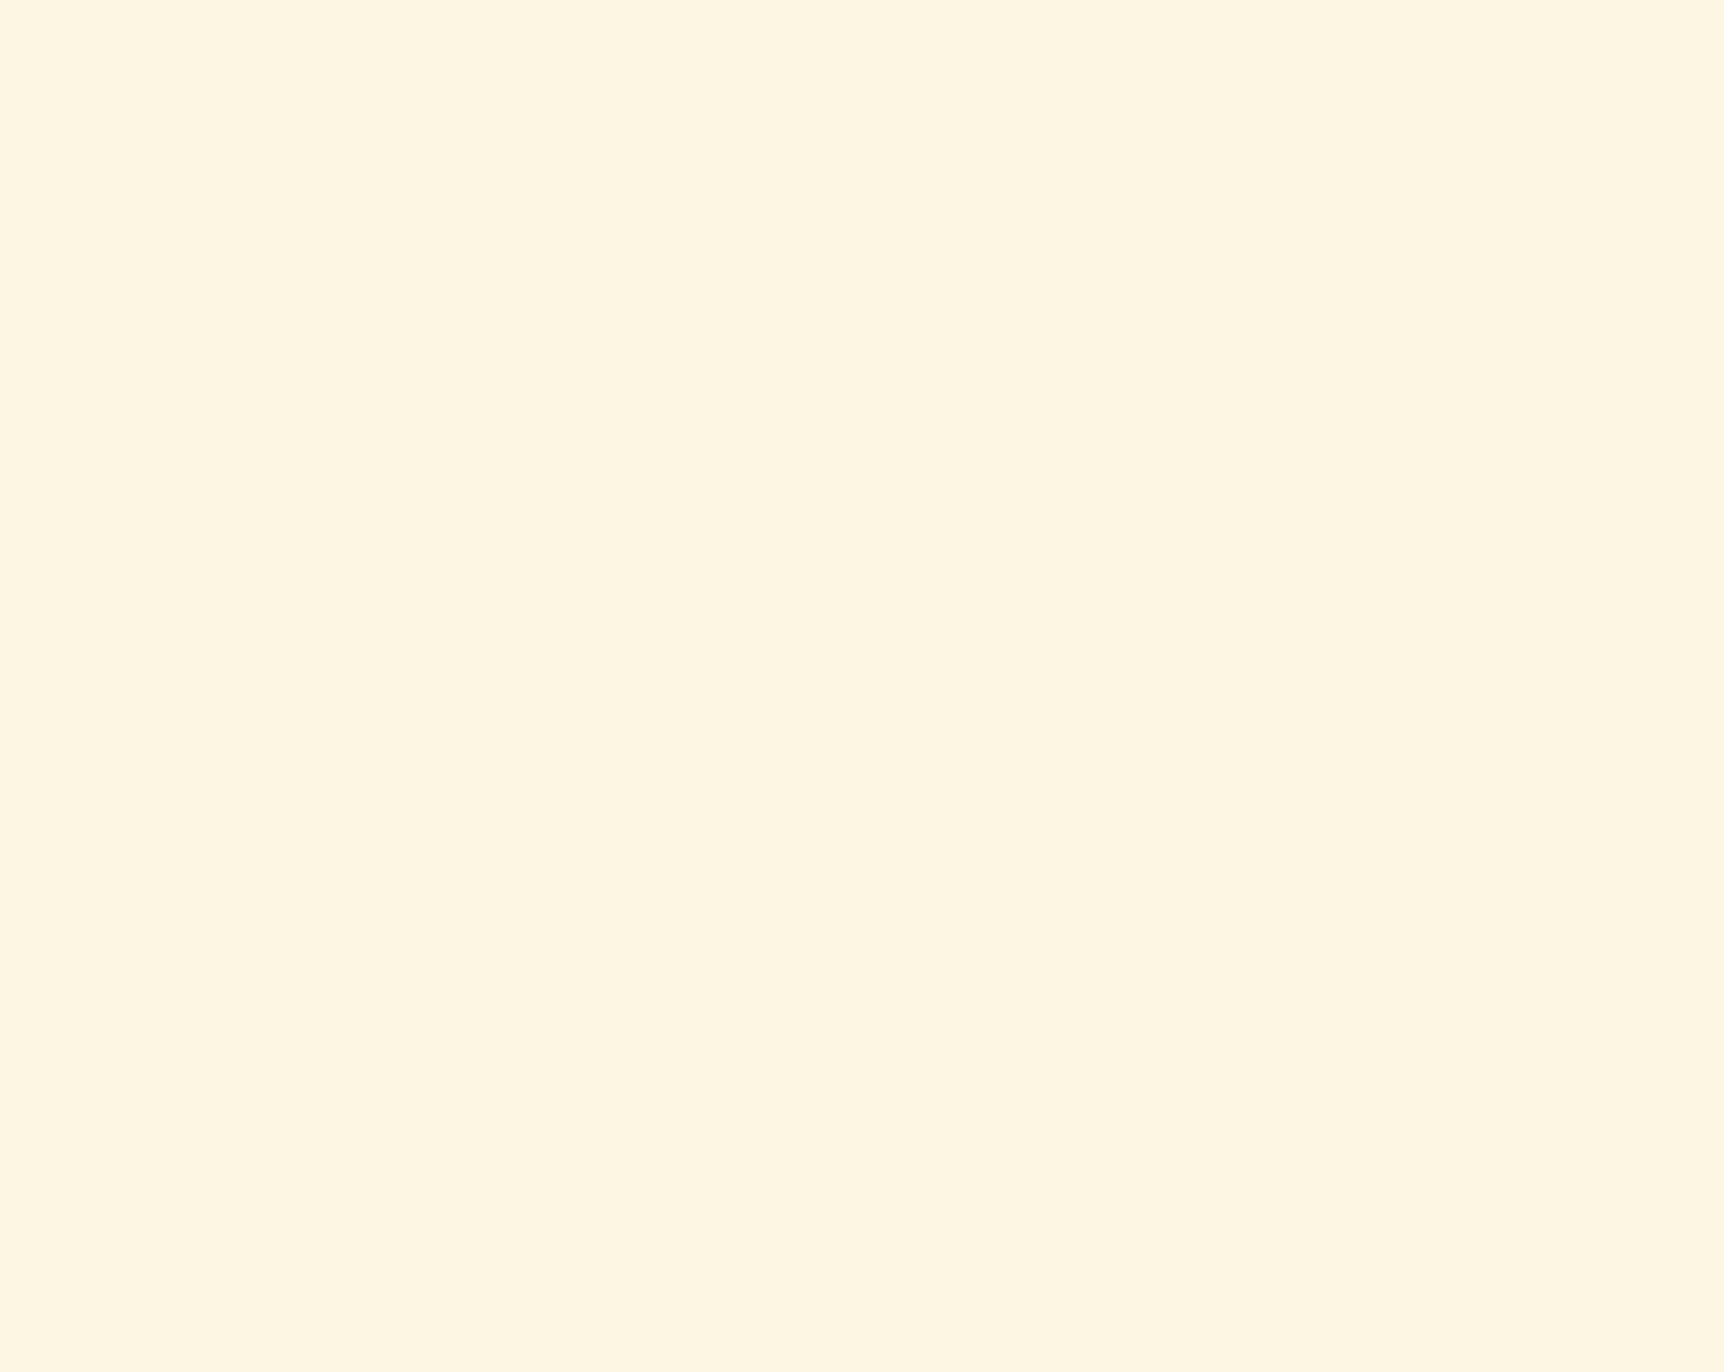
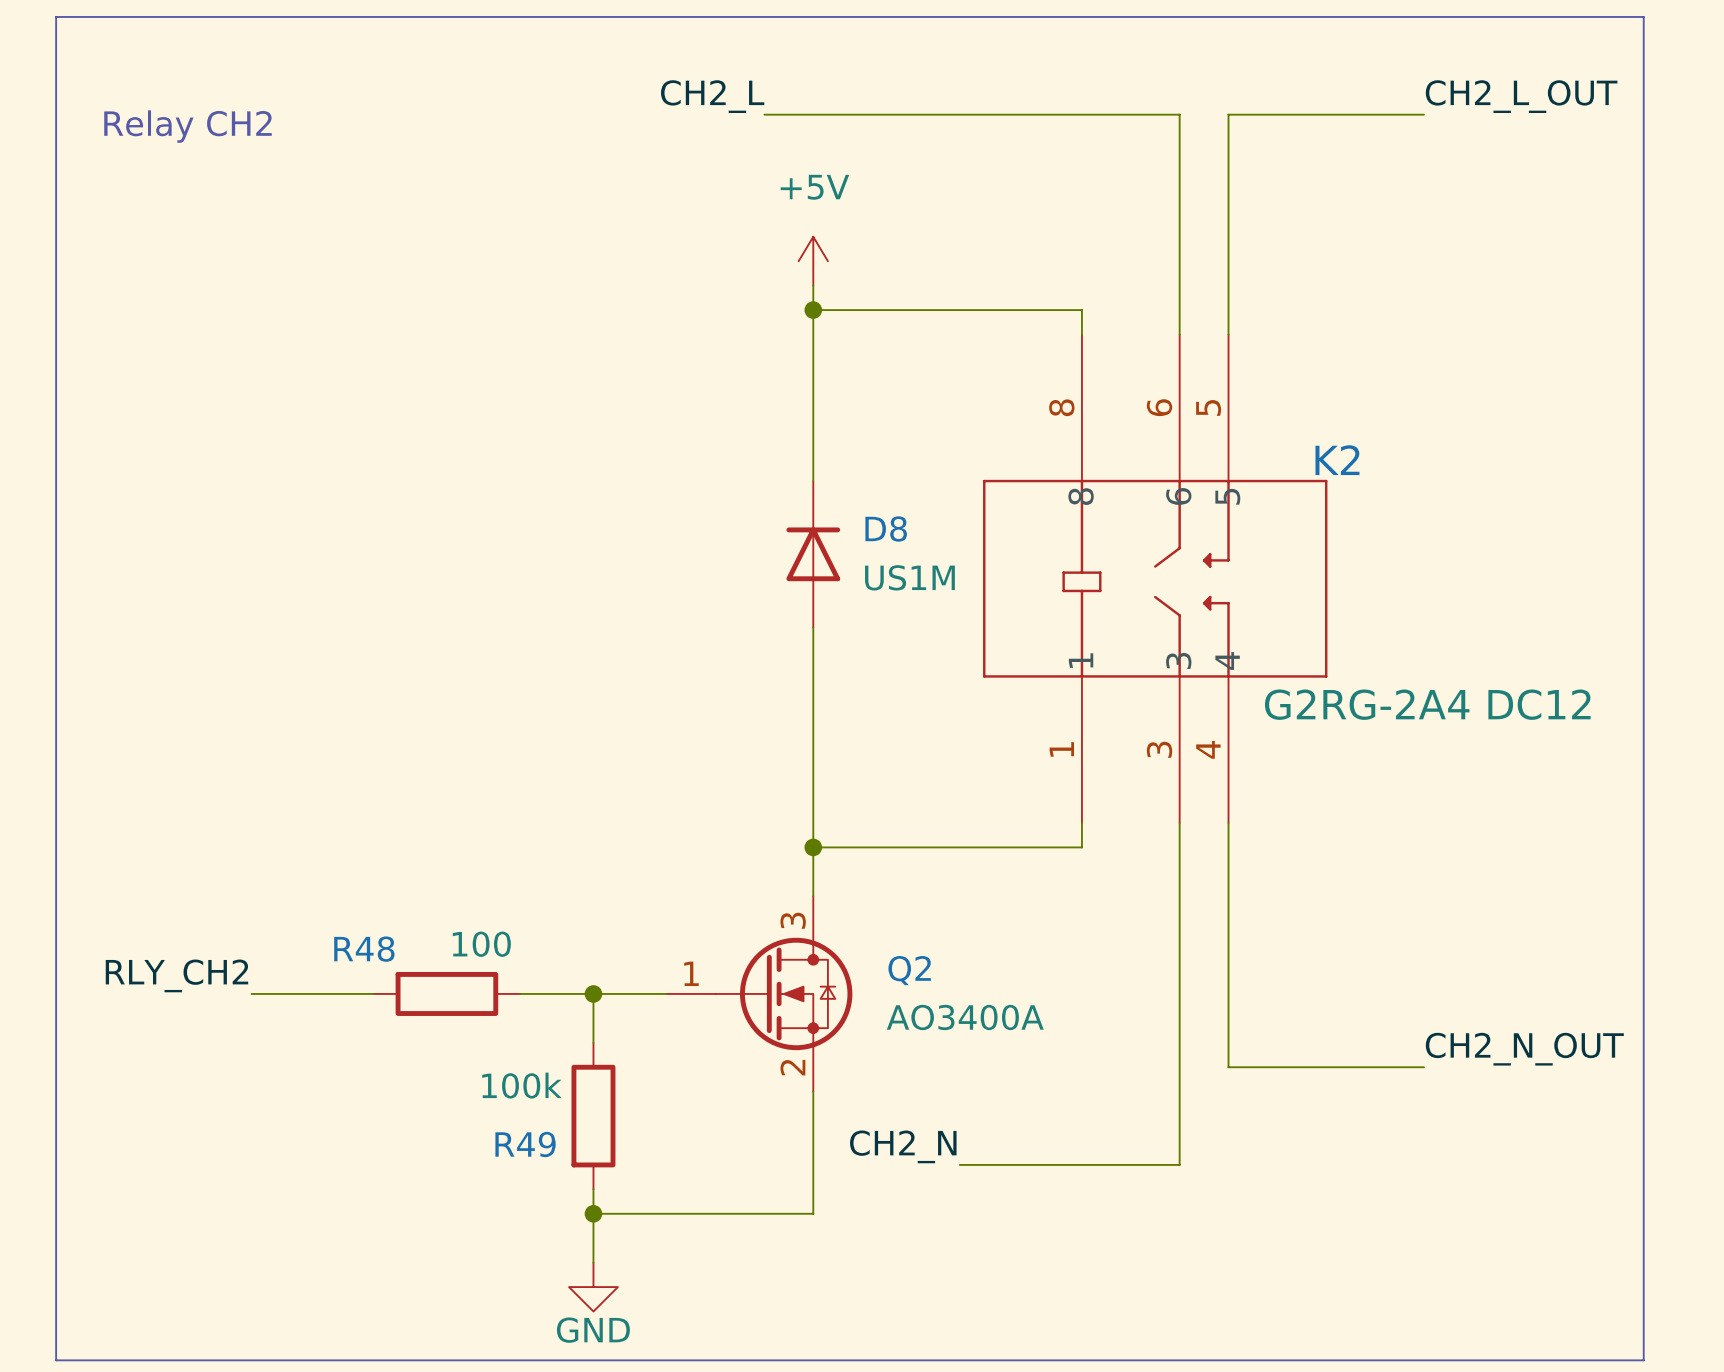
line: none -> (56, 16) (1643, 16) (1643, 1360) (56, 1360) (56, 16)
label: none -> CH2_L (712, 96)
label: none -> CH2_L_OUT (1521, 96)
wire: none -> (764, 114) (1179, 114) (1179, 334)
wire: none -> (1423, 114) (1228, 114) (1228, 334)
text: none -> Relay CH2 (187, 126)
power symbol: none -> +5V (813, 261)
wire: none -> (813, 285) (813, 481)
wire: none -> (813, 310) (1081, 310) (1081, 334)
junction: none -> (813, 310)
D8: none -> US1M (813, 554)
K2: none -> G2RG-2A4 DC12 (1155, 578)
wire: none -> (813, 627) (813, 896)
wire: none -> (1081, 822) (1081, 847) (813, 847)
wire: none -> (1179, 822) (1179, 1164) (959, 1164)
wire: none -> (1228, 822) (1228, 1067) (1423, 1067)
junction: none -> (813, 847)
label: none -> RLY_CH2 (176, 975)
wire: none -> (251, 993) (373, 993)
R48: none -> 100 (446, 993)
wire: none -> (520, 993) (666, 993)
wire: none -> (593, 993) (593, 1042)
junction: none -> (593, 993)
Q2: none -> AO3400A (759, 993)
label: none -> CH2_N_OUT (1524, 1049)
wire: none -> (813, 1091) (813, 1213) (593, 1213)
R49: none -> 100k (593, 1116)
label: none -> CH2_N (903, 1146)
wire: none -> (593, 1189) (593, 1262)
junction: none -> (593, 1213)
power symbol: none -> GND (593, 1287)

